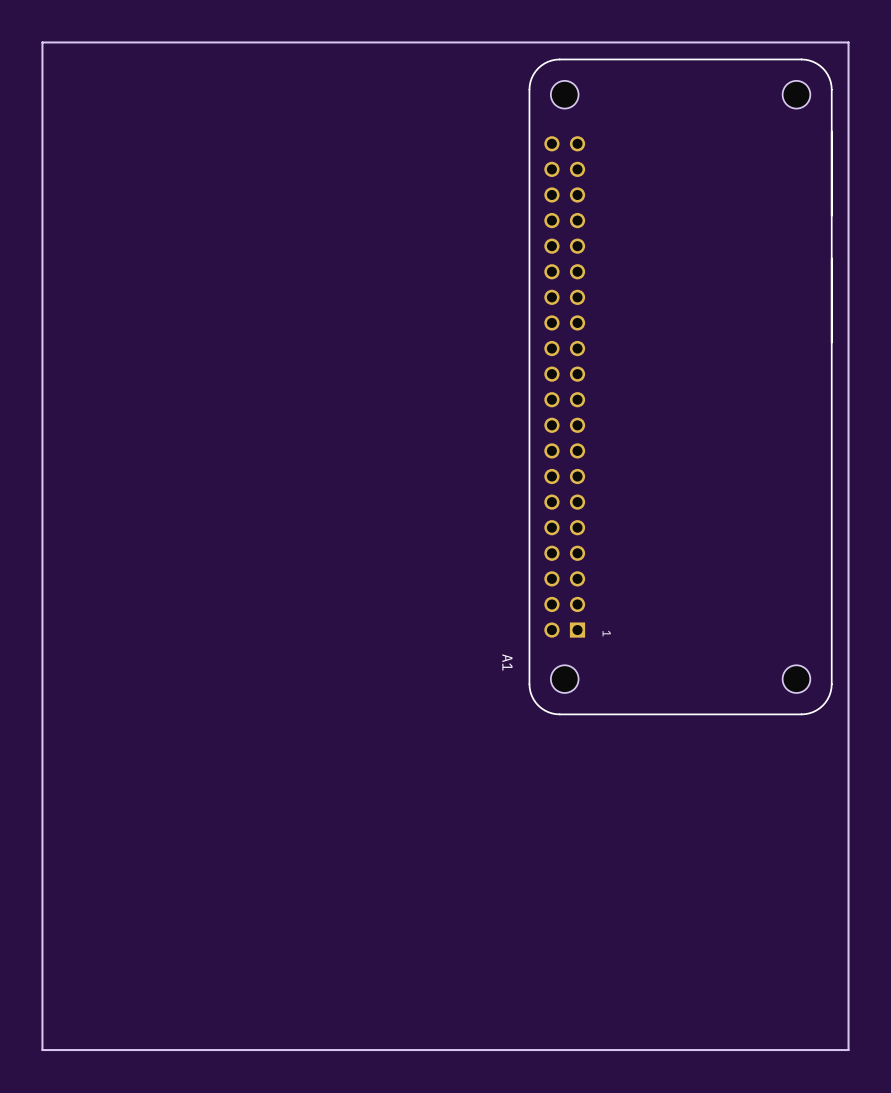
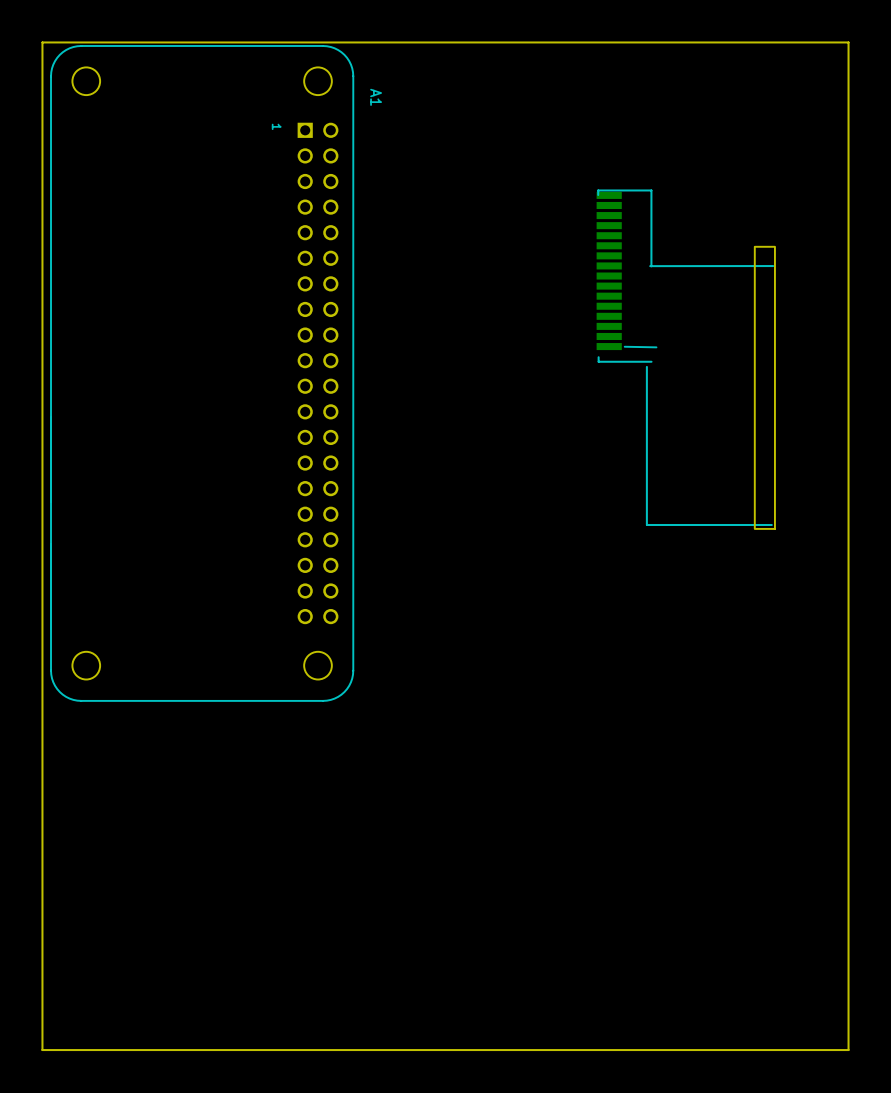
part: none -> (685, 359)
A1 rotation: 0° (680, 386) -> 180° (202, 373)
A1 position: (680, 386) -> (202, 373)

